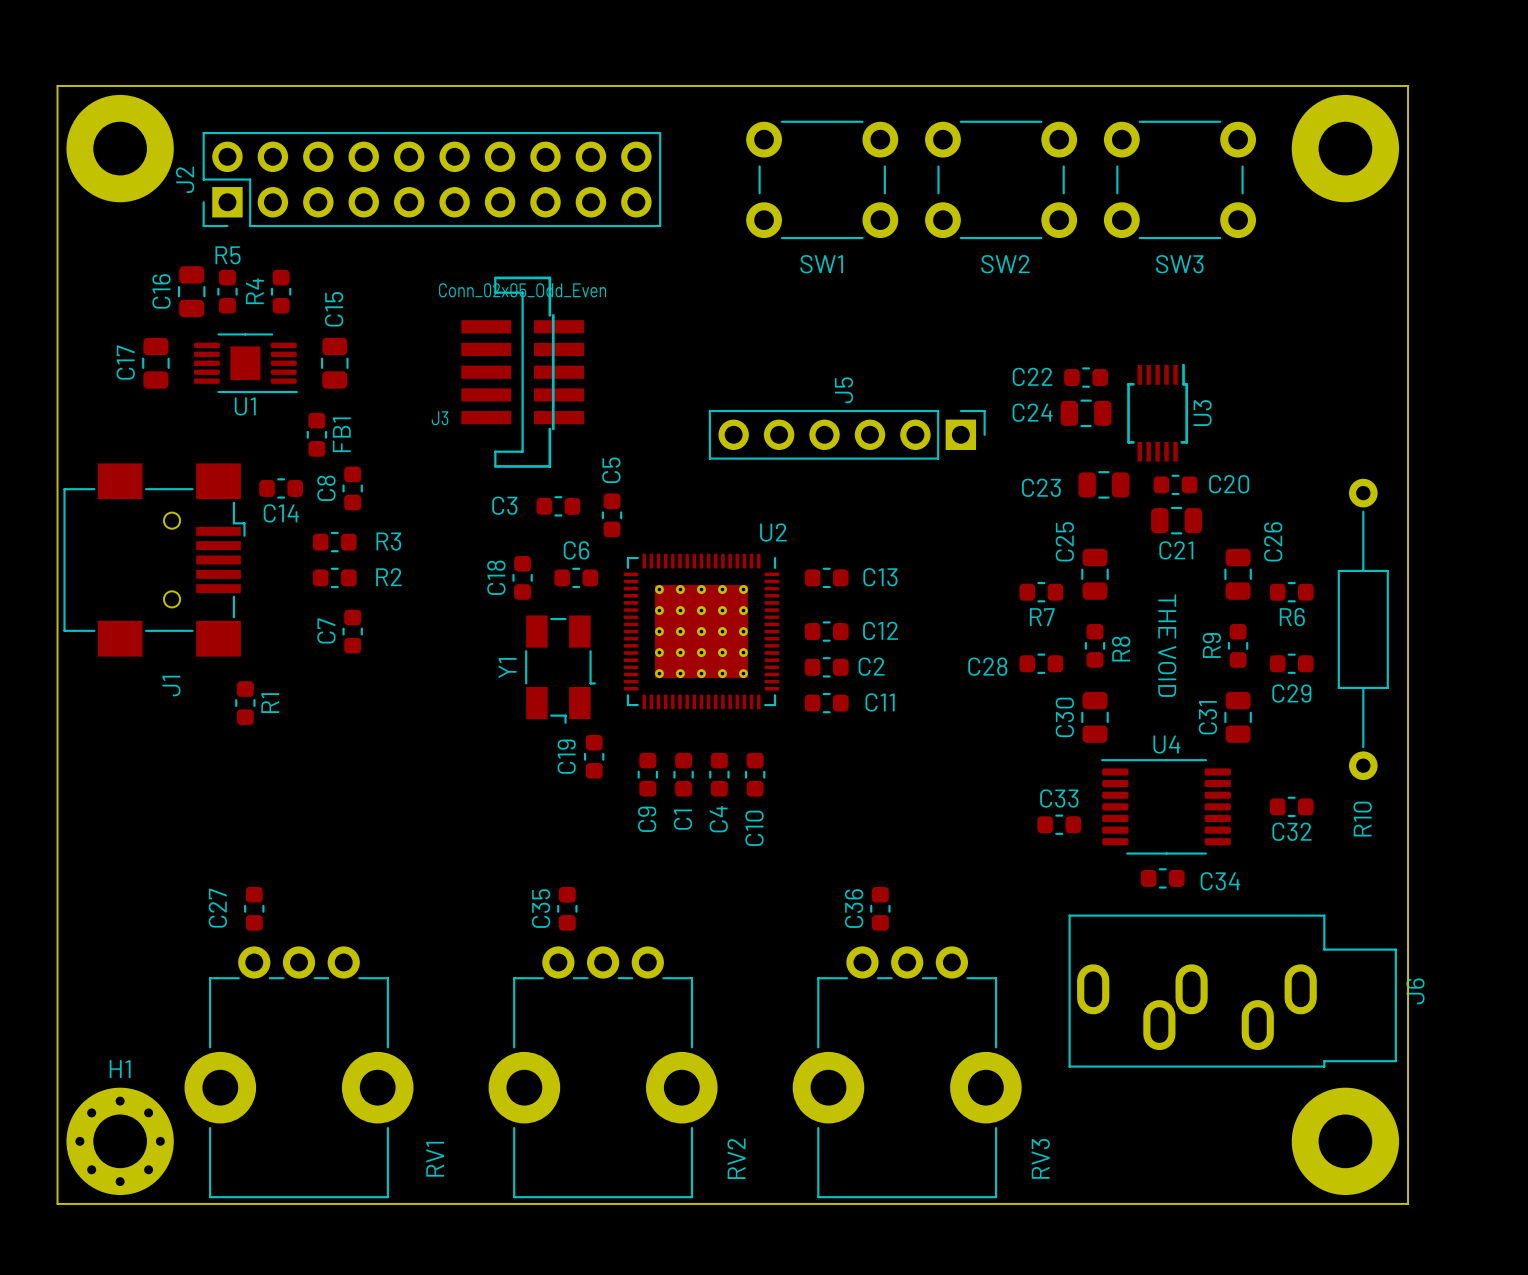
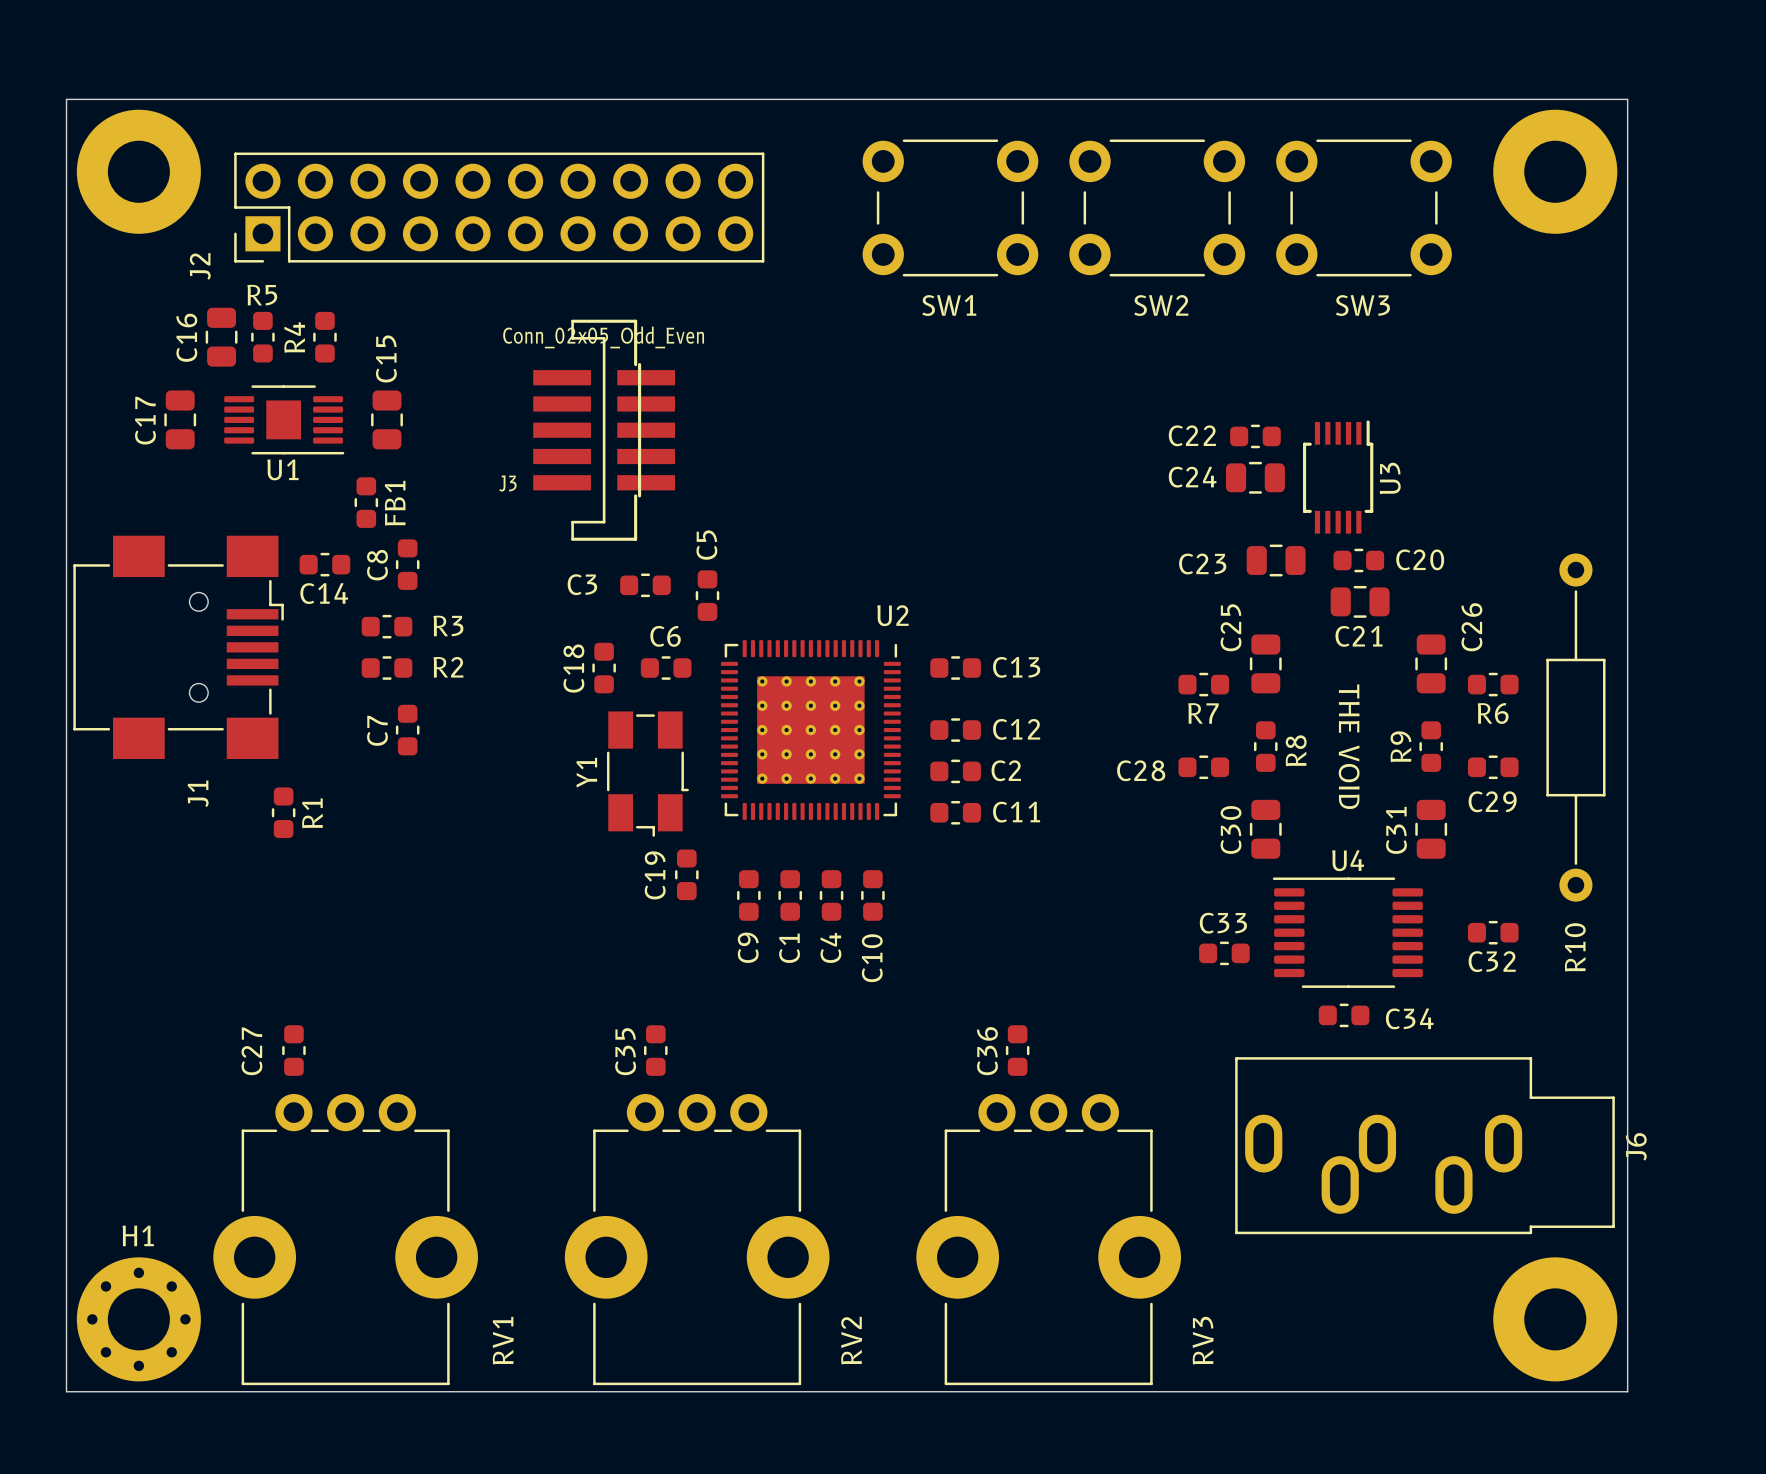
J2 name position: J2 (185, 179) -> J2 (200, 266)
J5: (847, 434) -> none

